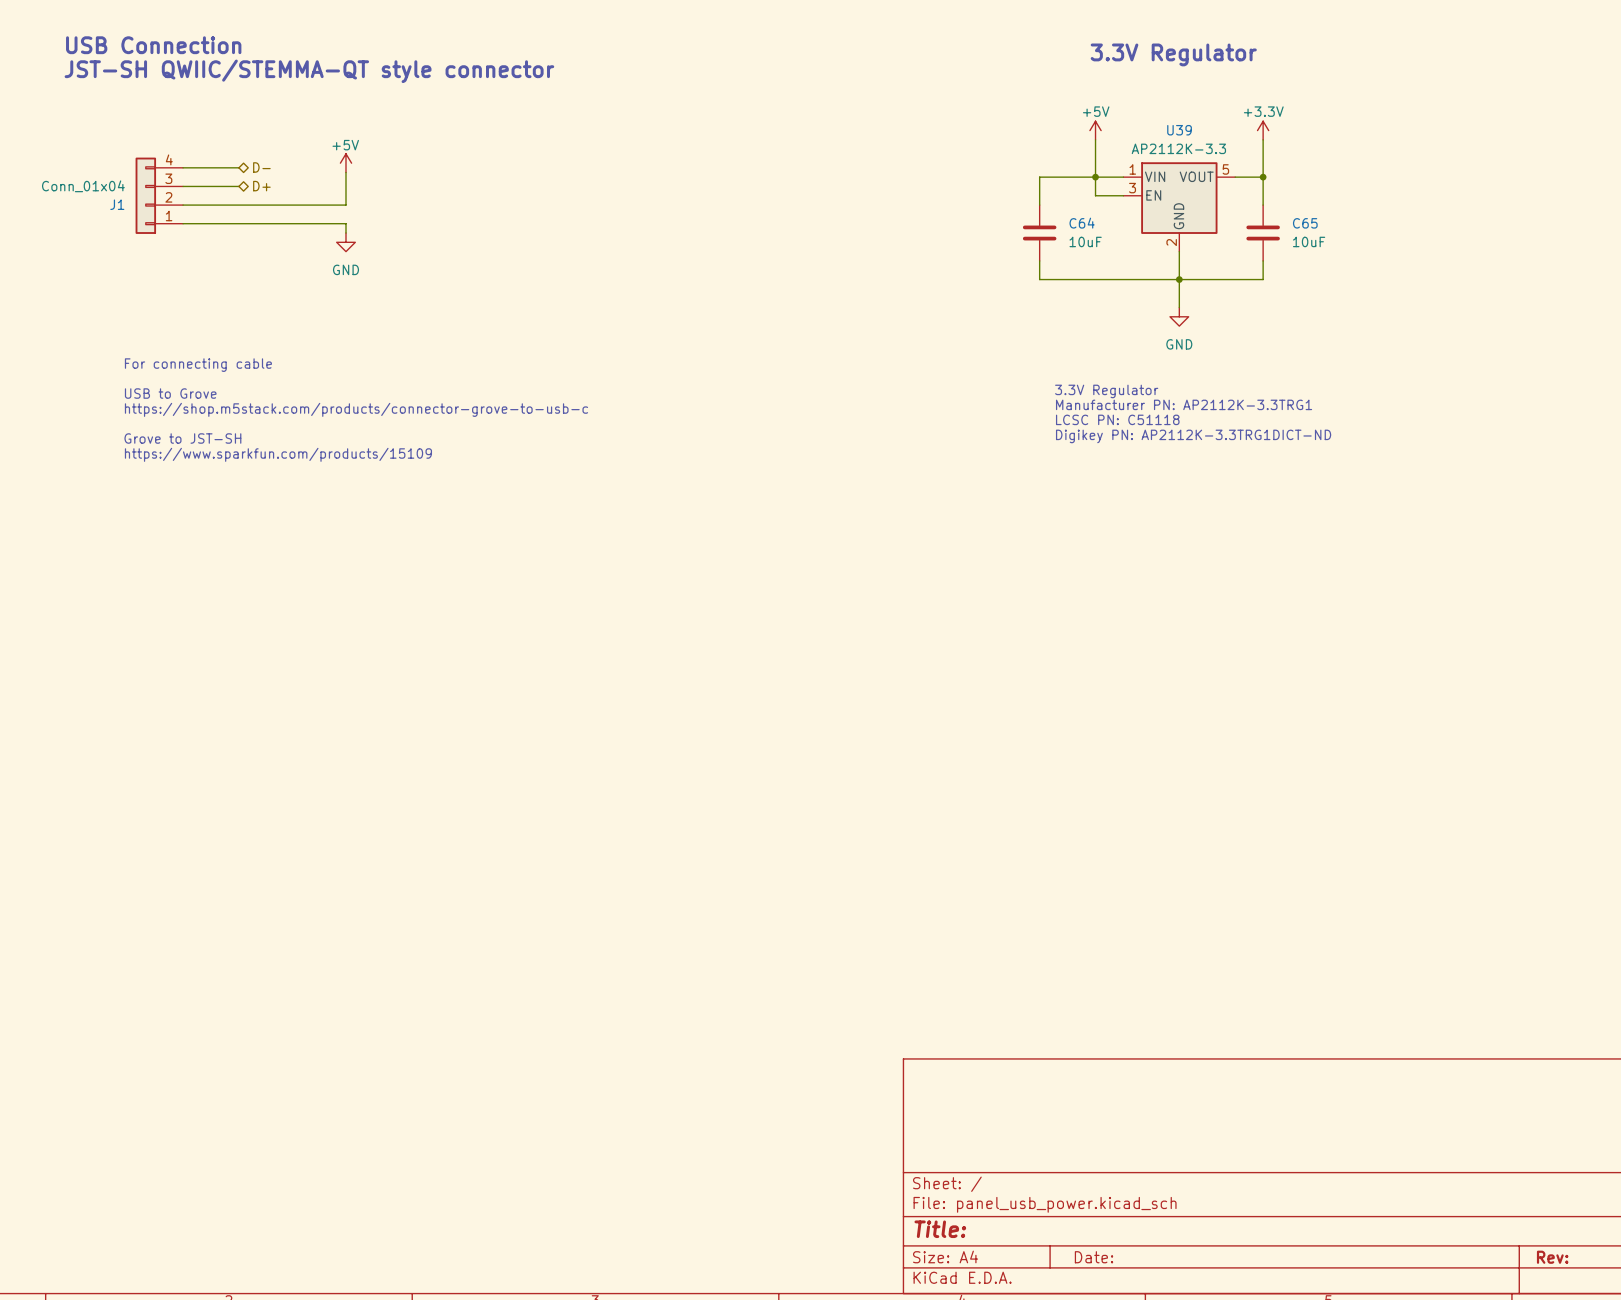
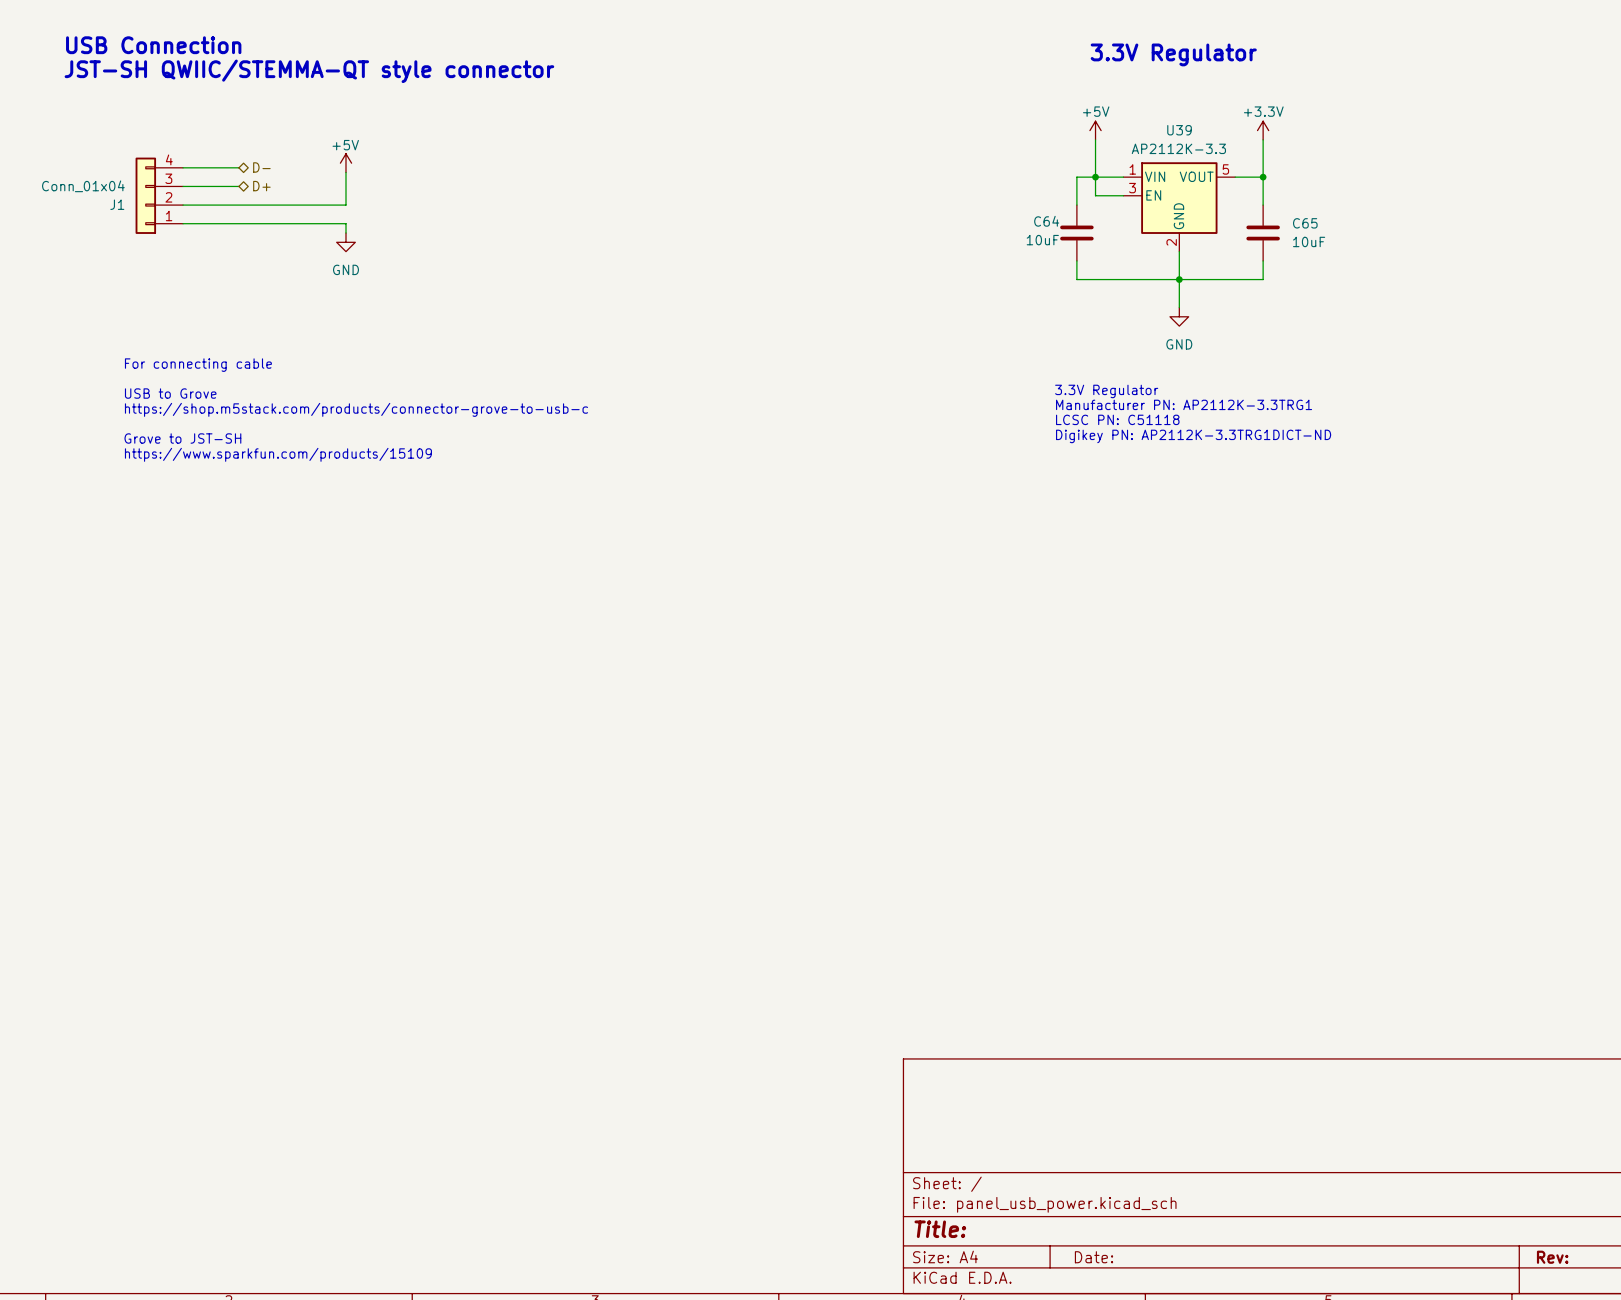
wire: (1076, 177) (1039, 177) (1039, 205) -> (1076, 177) (1076, 205)
C64 name position: C64 (1082, 223) -> C64 (1046, 221)
C64 position: (1039, 233) -> (1076, 233)
C64 value position: 10uF (1085, 241) -> 10uF (1042, 240)
wire: (1039, 260) (1039, 279) (1076, 279) -> (1076, 260) (1076, 279)

